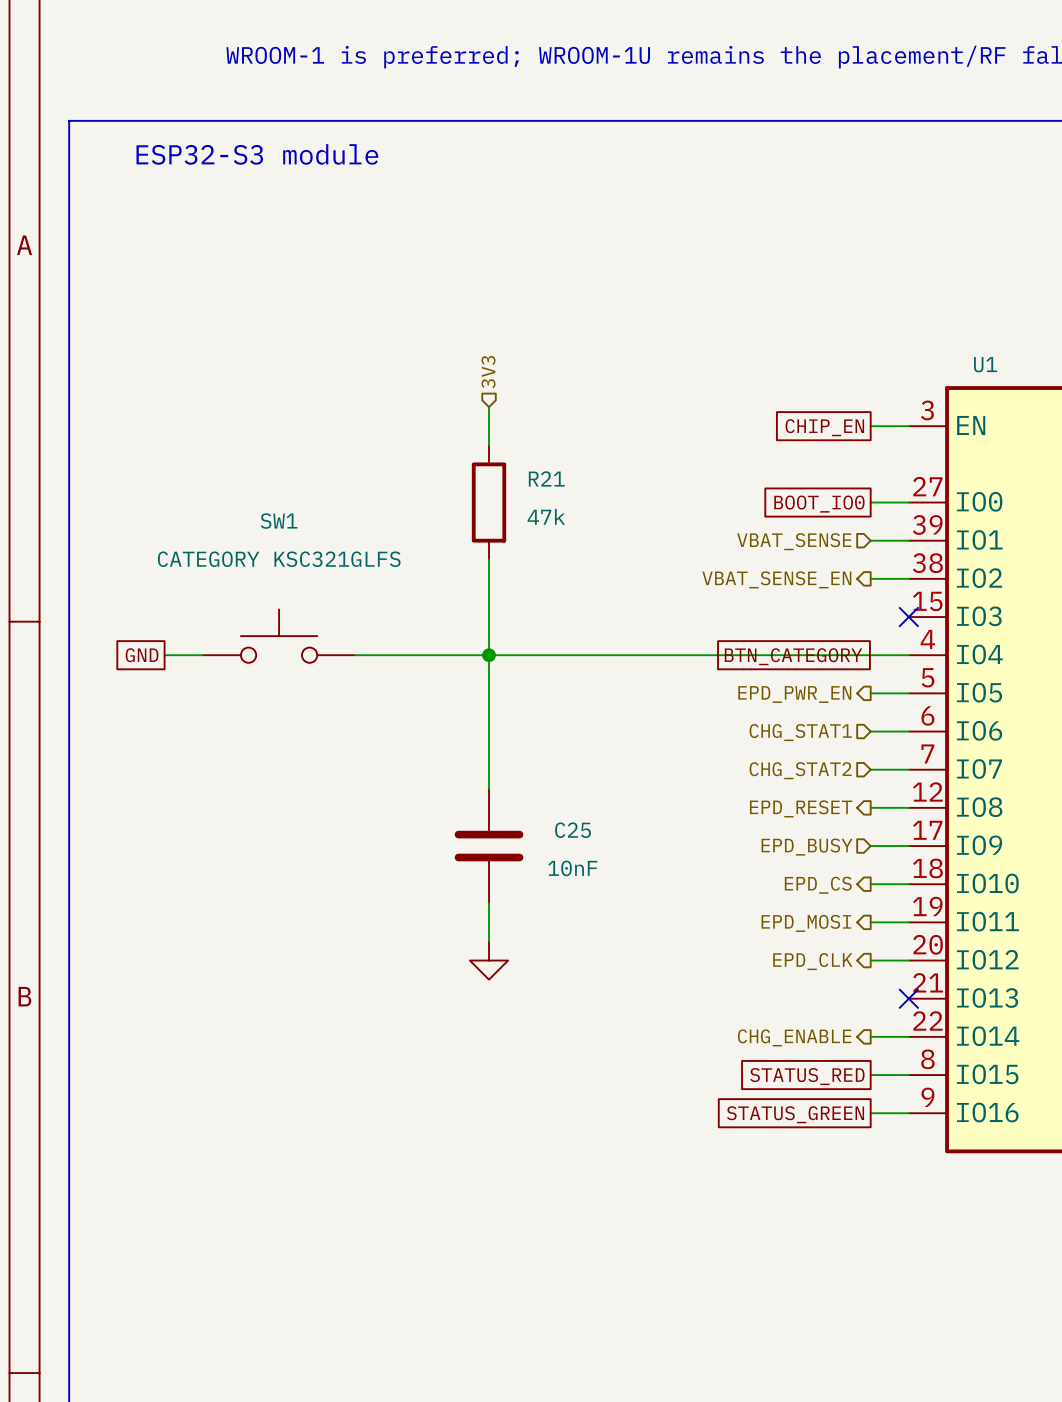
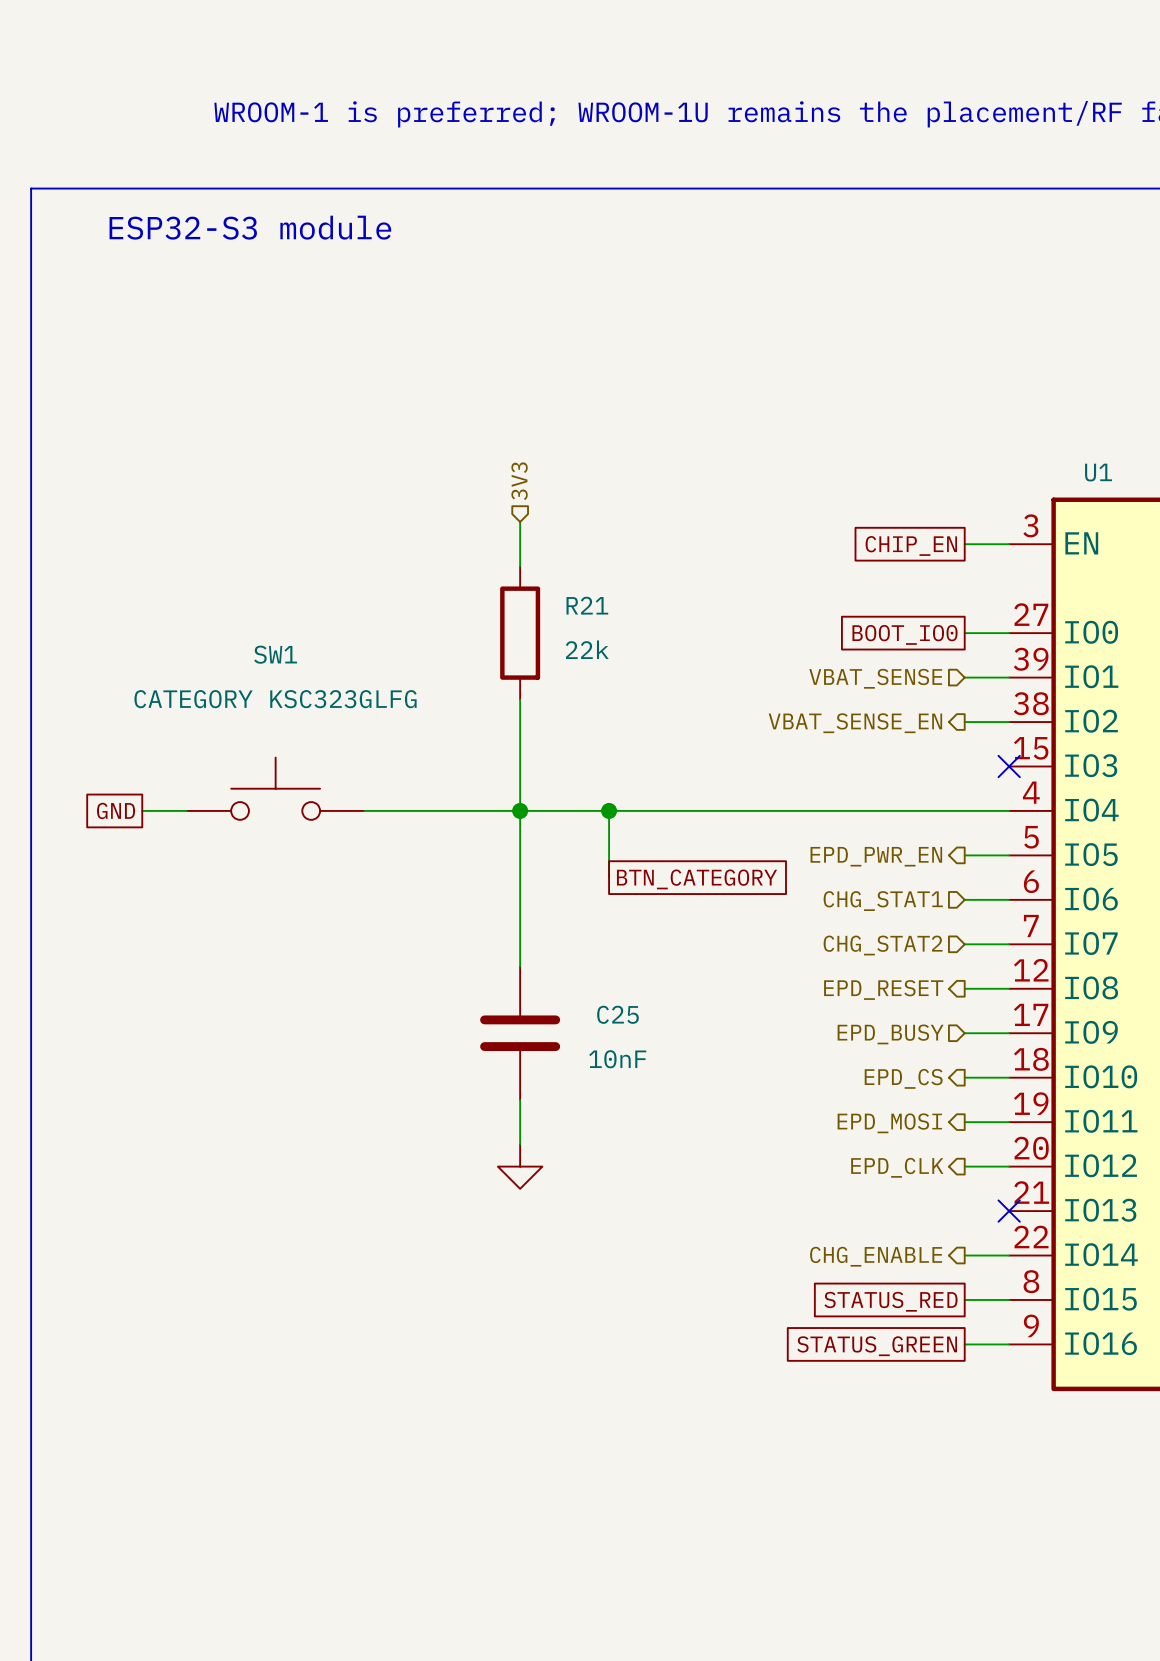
R21 value: 47k (546, 516) -> 22k (587, 649)
SW1 value: CATEGORY KSC321GLFS (279, 559) -> CATEGORY KSC323GLFG (275, 699)
wire: none -> (609, 810) (609, 877)
junction: none -> (609, 810)
global label position: BTN_CATEGORY (793, 656) -> BTN_CATEGORY (697, 879)

